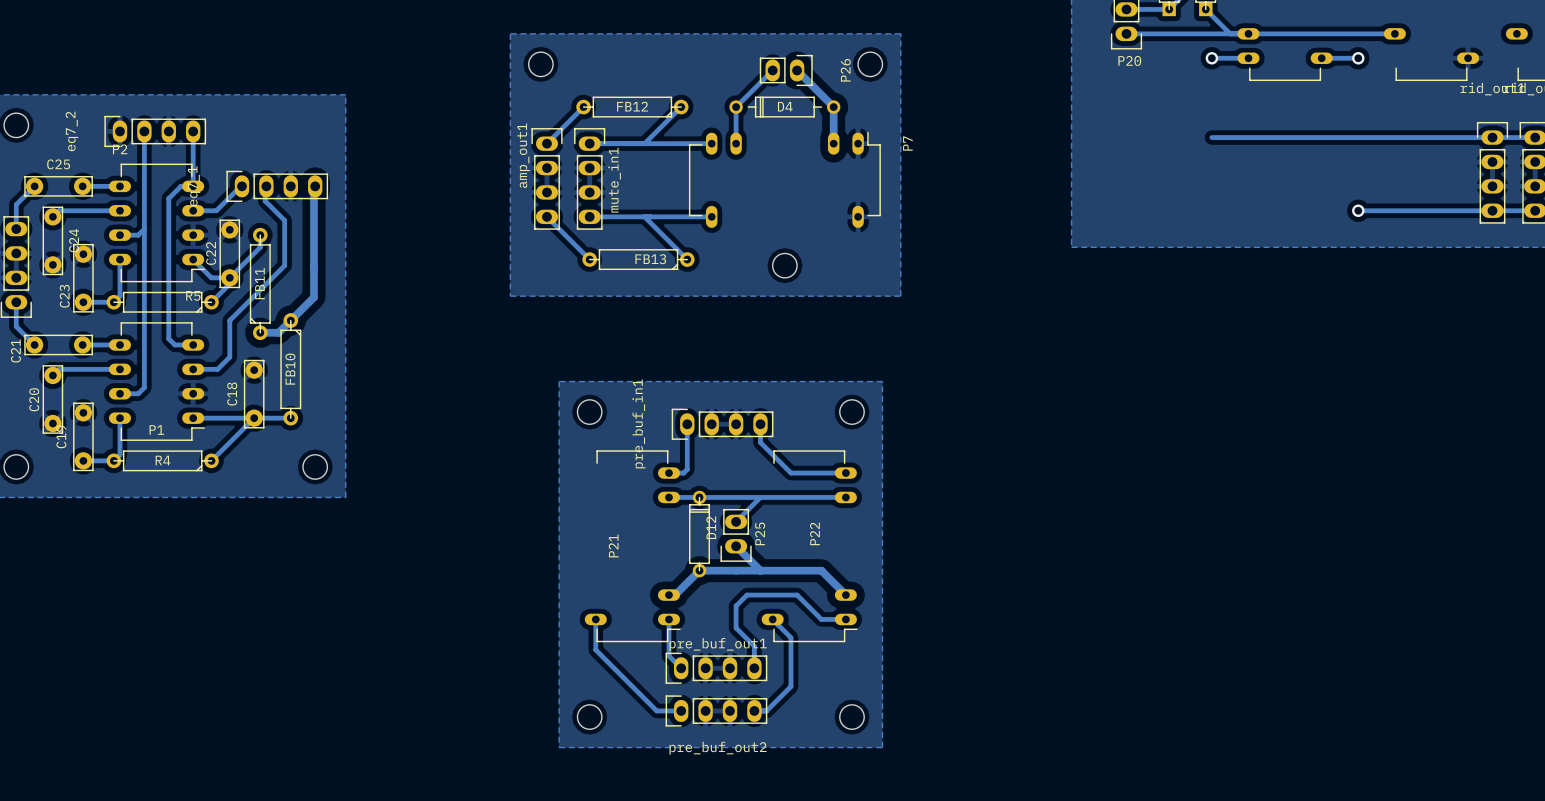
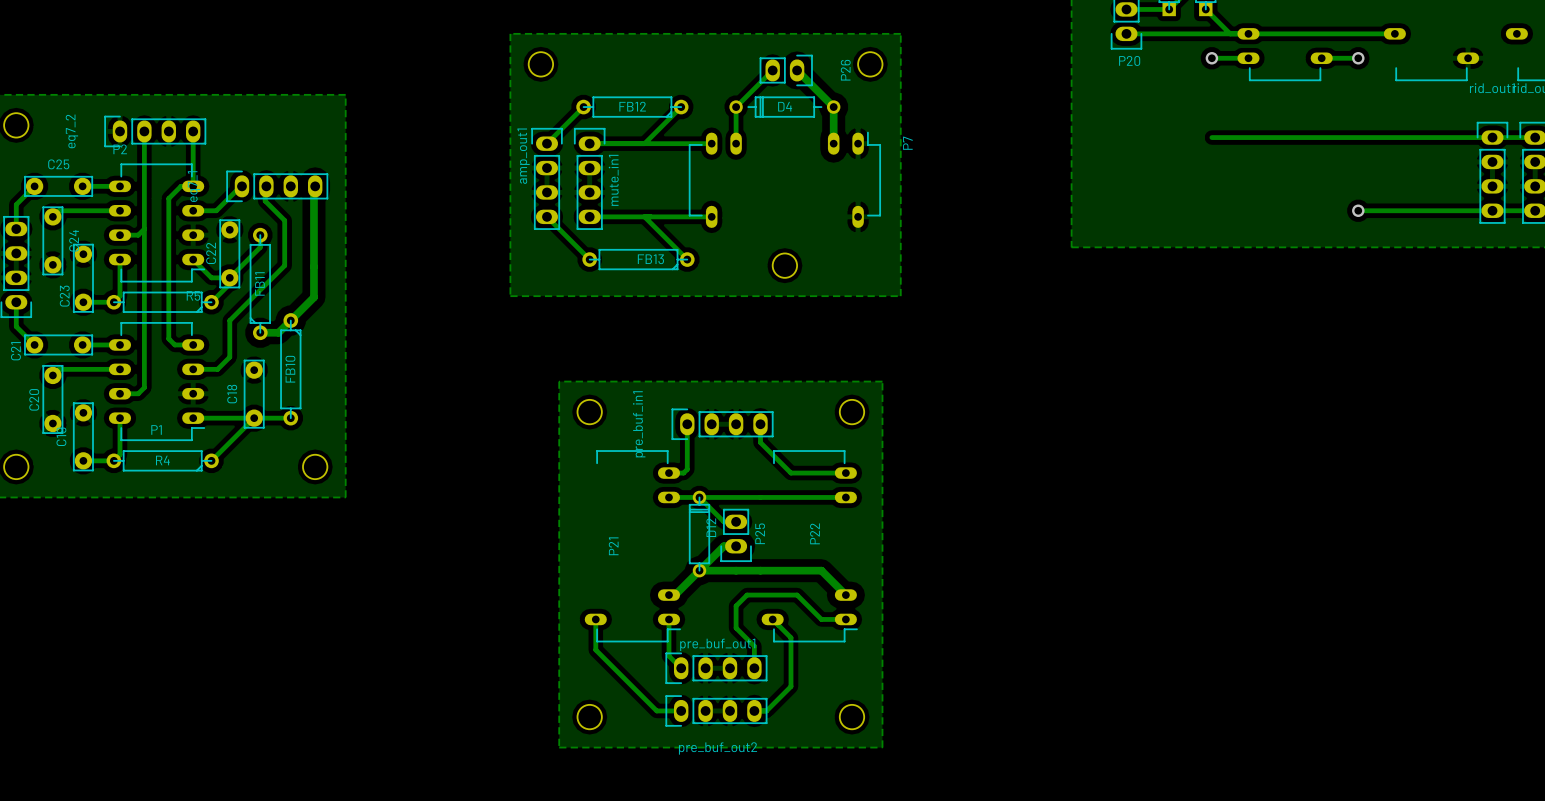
bottom track: (760, 497) (736, 521) -> (699, 497) (723, 521) (736, 521)
bottom track: (736, 546) (760, 570) -> (736, 546) (723, 546) (699, 570)

